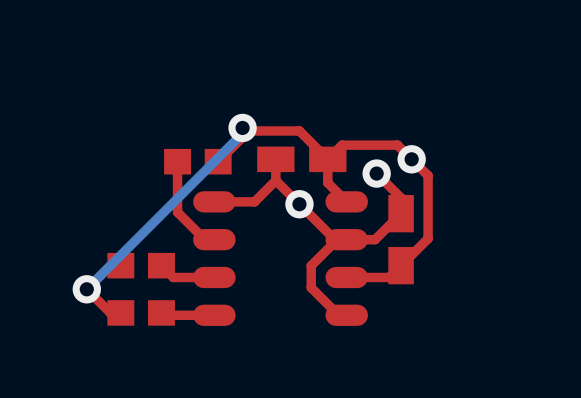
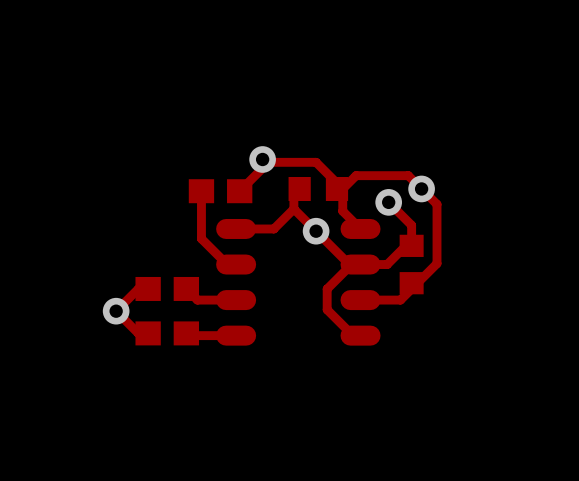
bottom track: (242, 133) (86, 289) -> none
part footprint: [257, 146, 347, 173] -> [288, 176, 349, 201]
part footprint: [388, 195, 414, 285] -> [399, 234, 424, 295]

